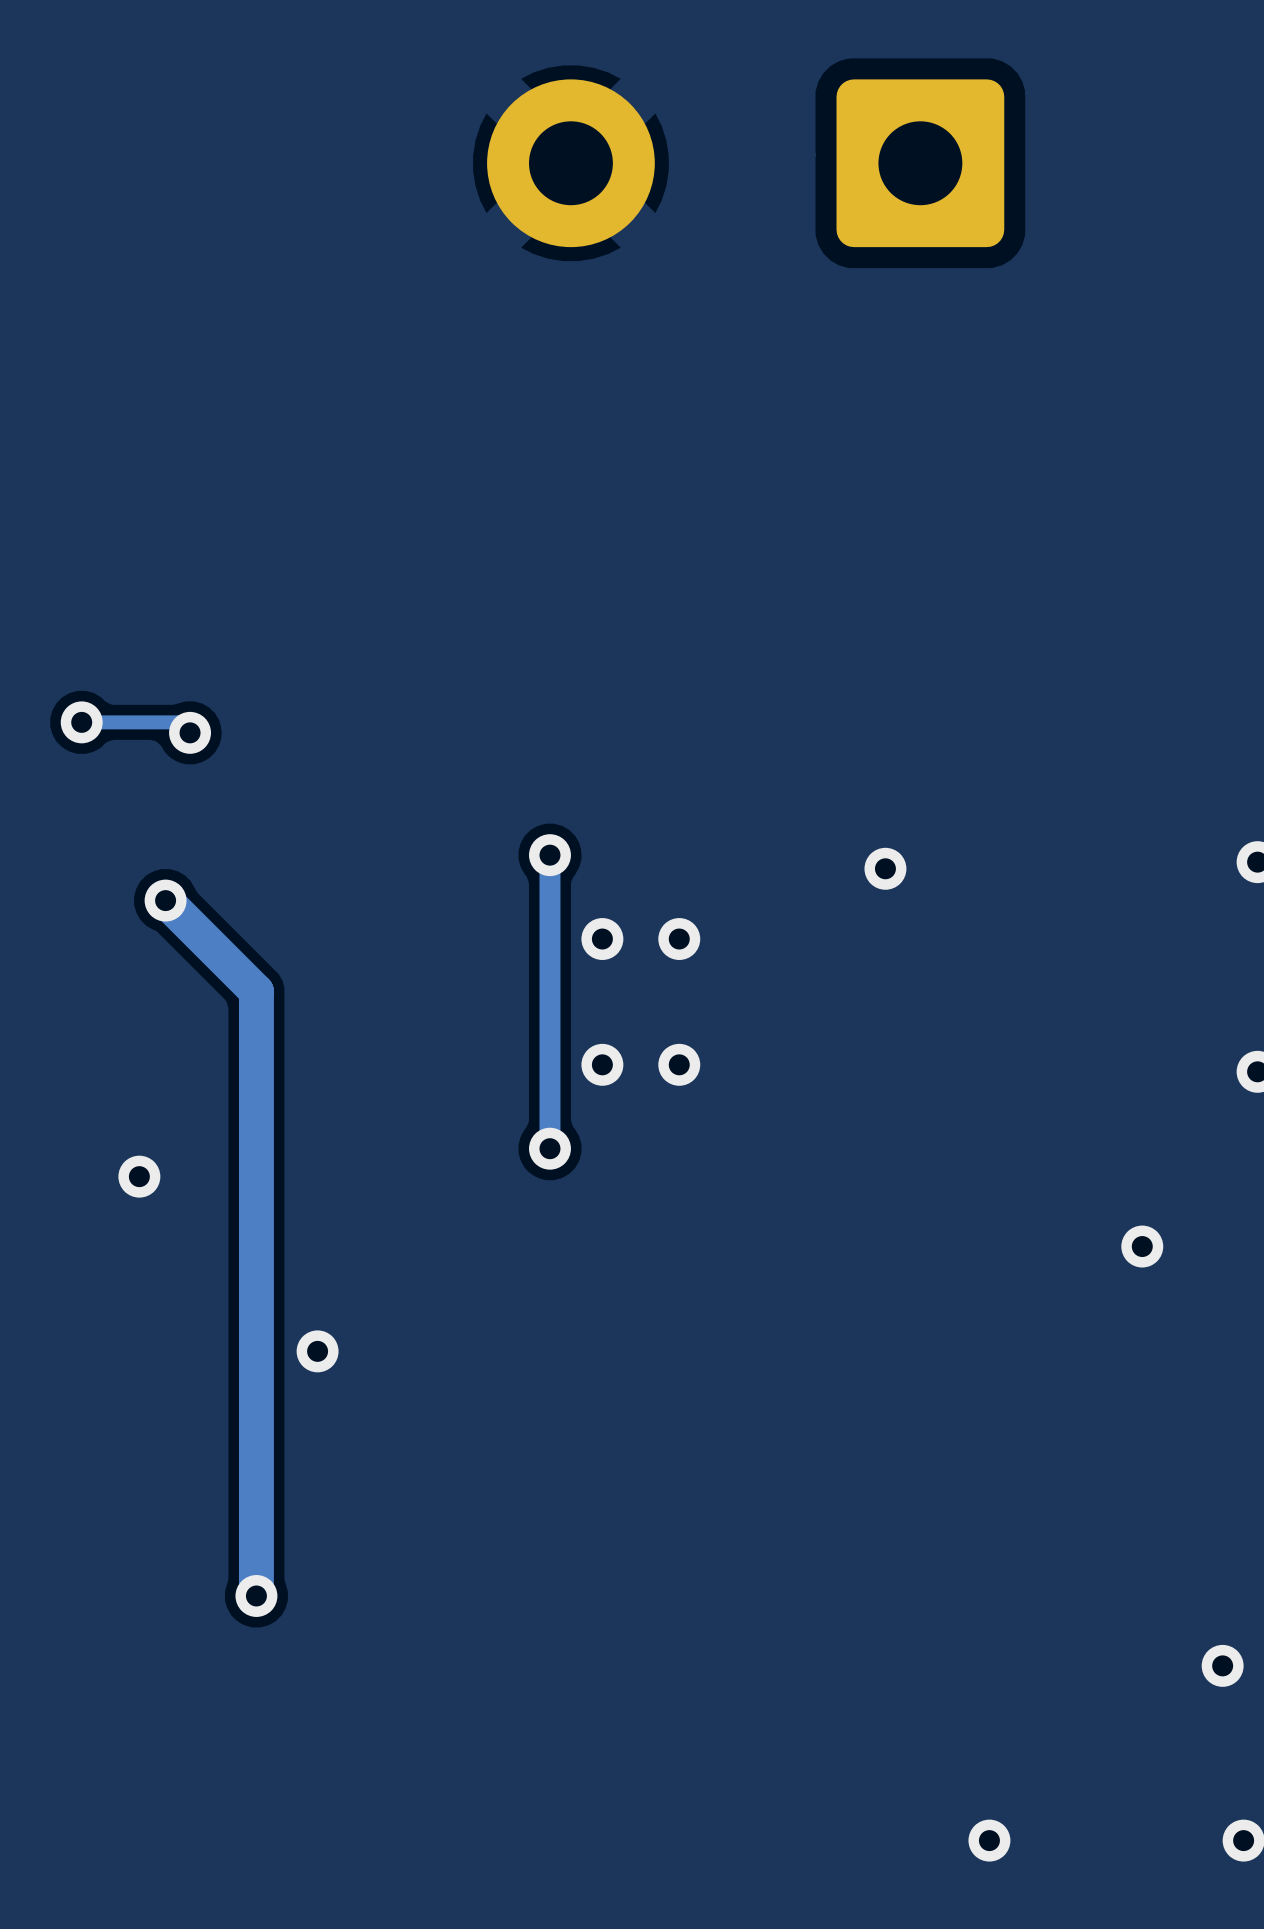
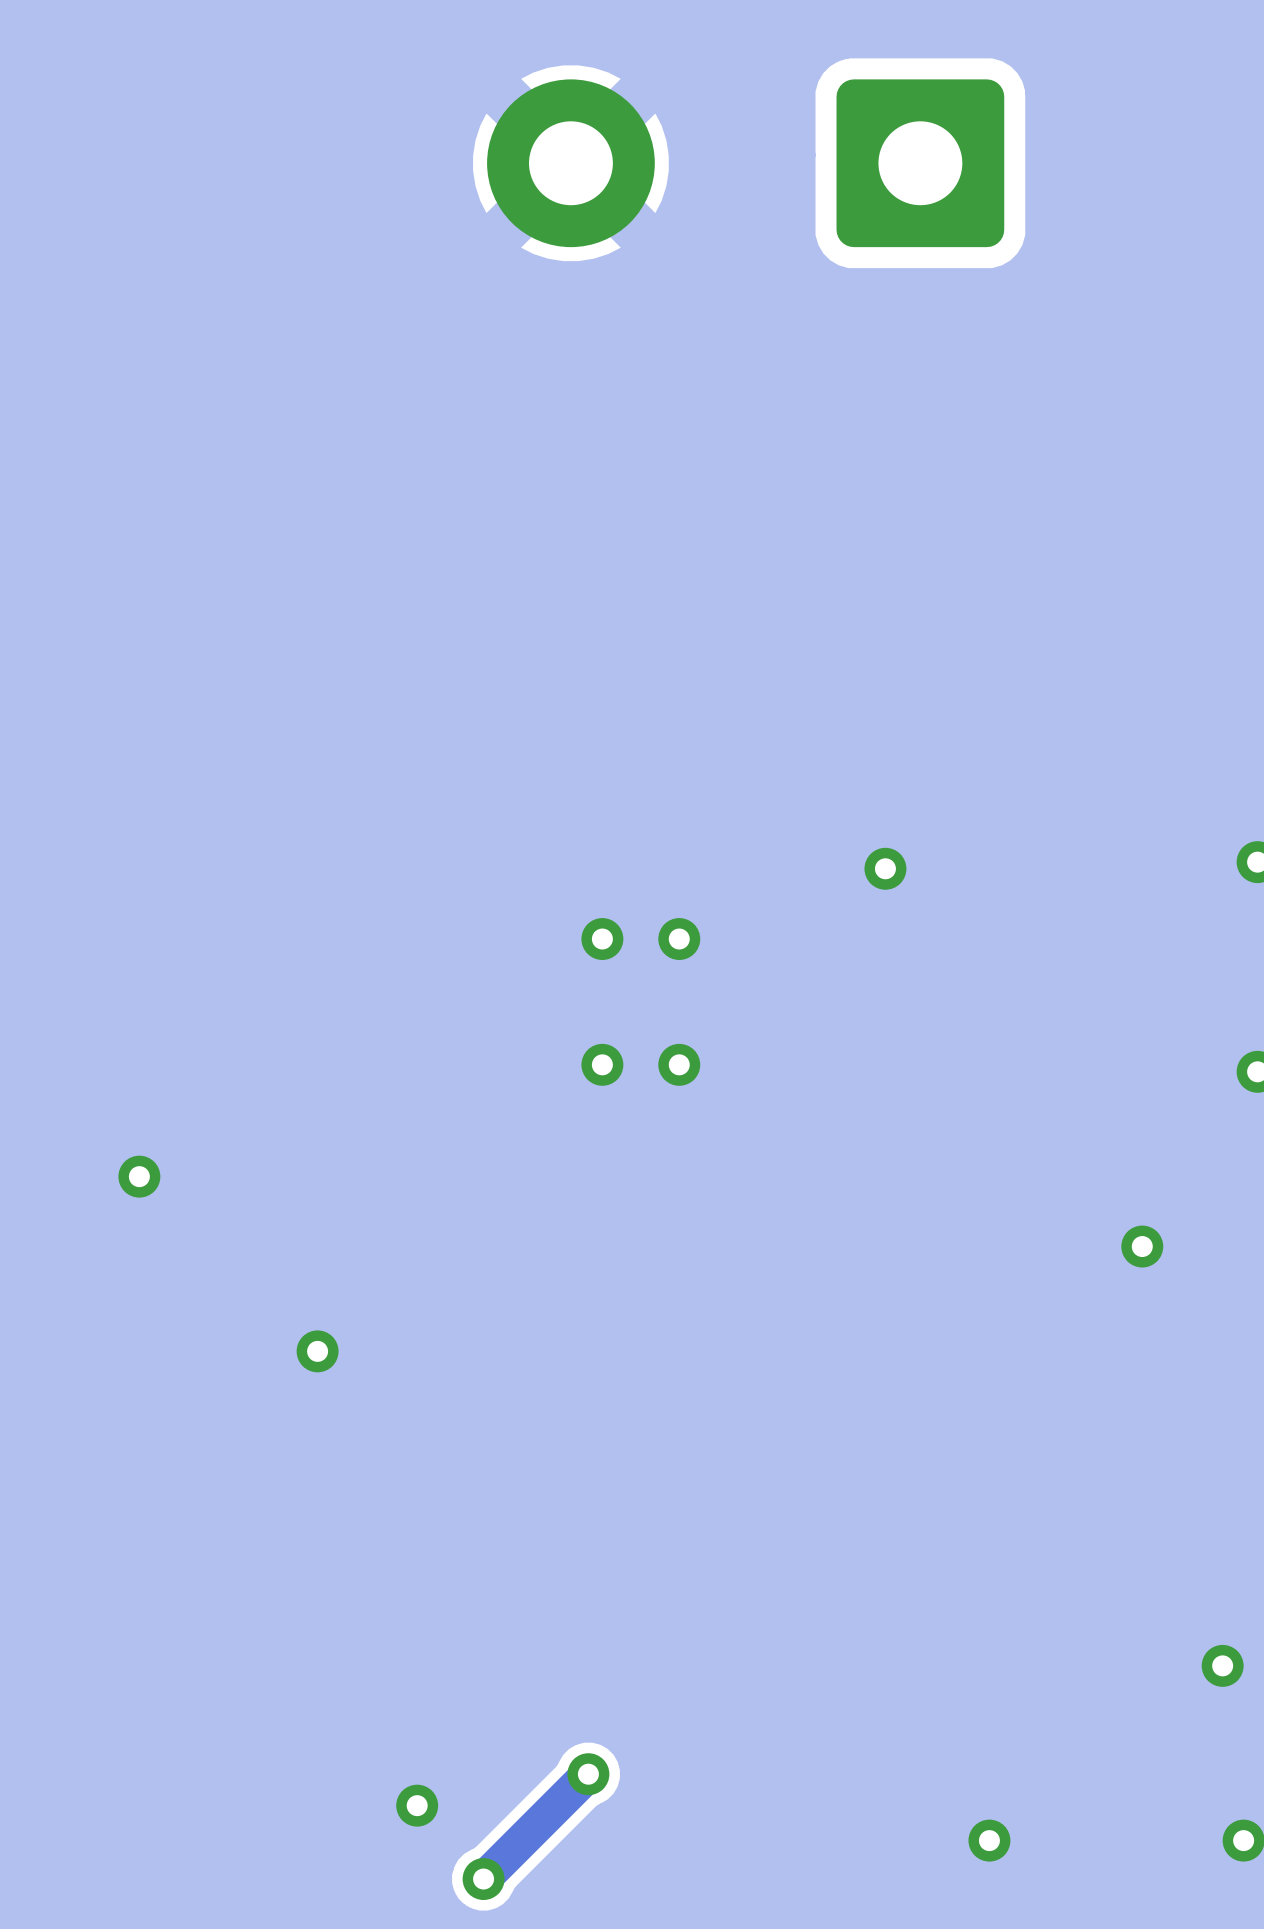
track: (81, 722) (179, 722) (190, 732) -> none
via: (81, 722) -> none
via: (190, 732) -> none
track: (549, 855) (549, 1148) -> none
via: (549, 855) -> none
track: (165, 900) (256, 991) (256, 1595) -> none
via: (165, 900) -> none
via: (549, 1148) -> none
via: (256, 1595) -> none
track: none -> (588, 1774) (483, 1879)
via: none -> (588, 1774)
via: none -> (417, 1805)
via: none -> (483, 1879)

